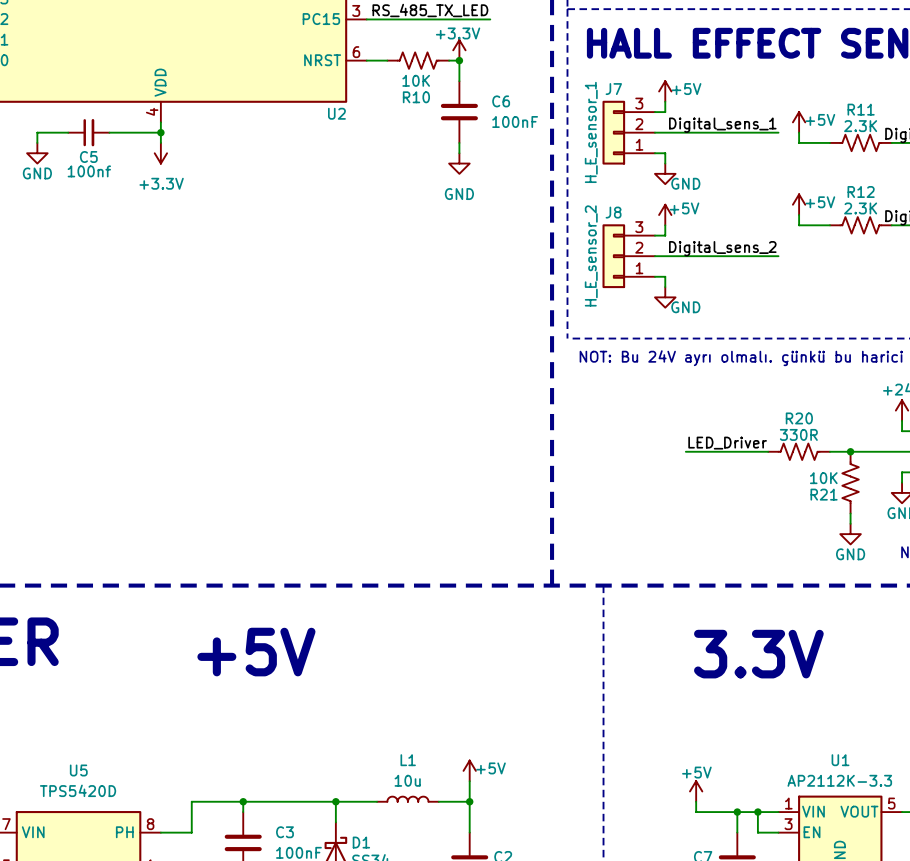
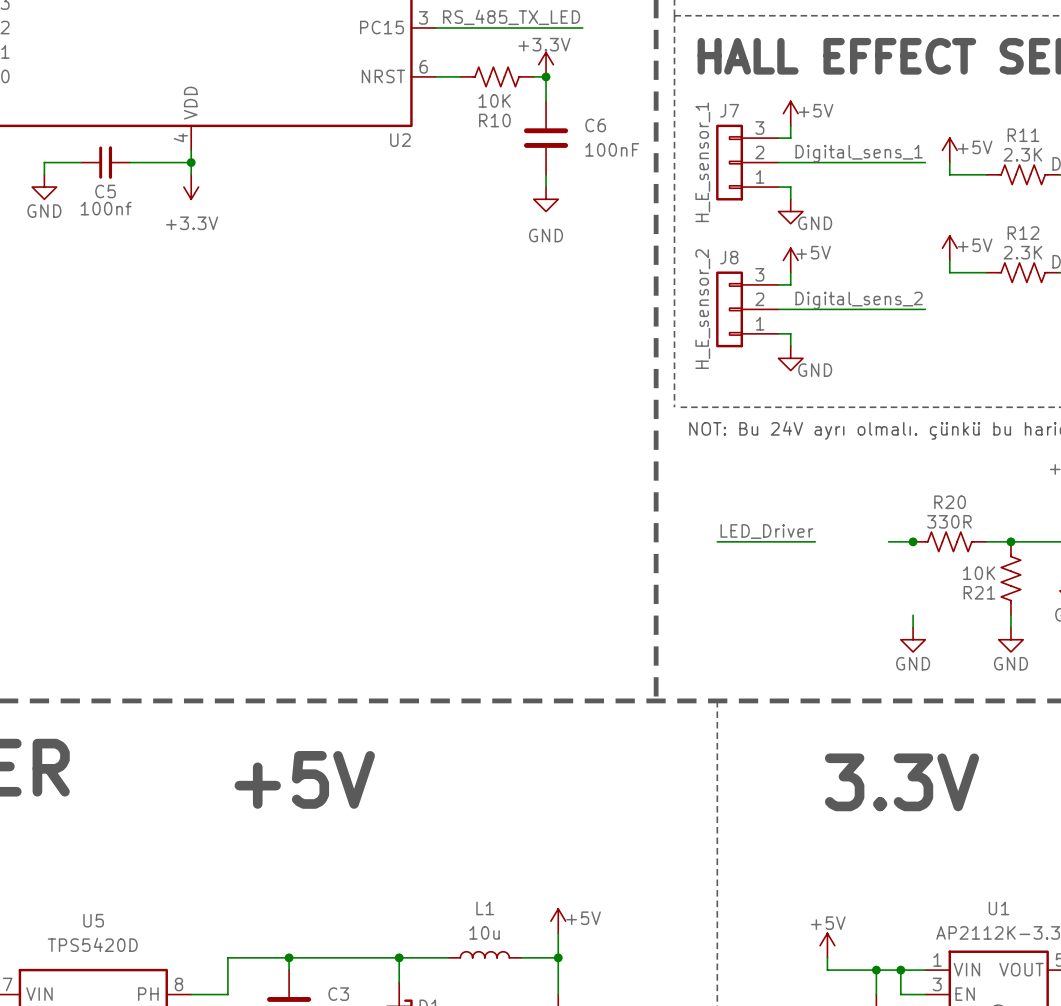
label position: LED_Driver (727, 443) -> LED_Driver (766, 531)
wire: (685, 451) (747, 451) -> (815, 541) (717, 541)
junction: none -> (913, 541)
wire: none -> (913, 615) (913, 627)
power symbol: none -> GND (913, 639)

